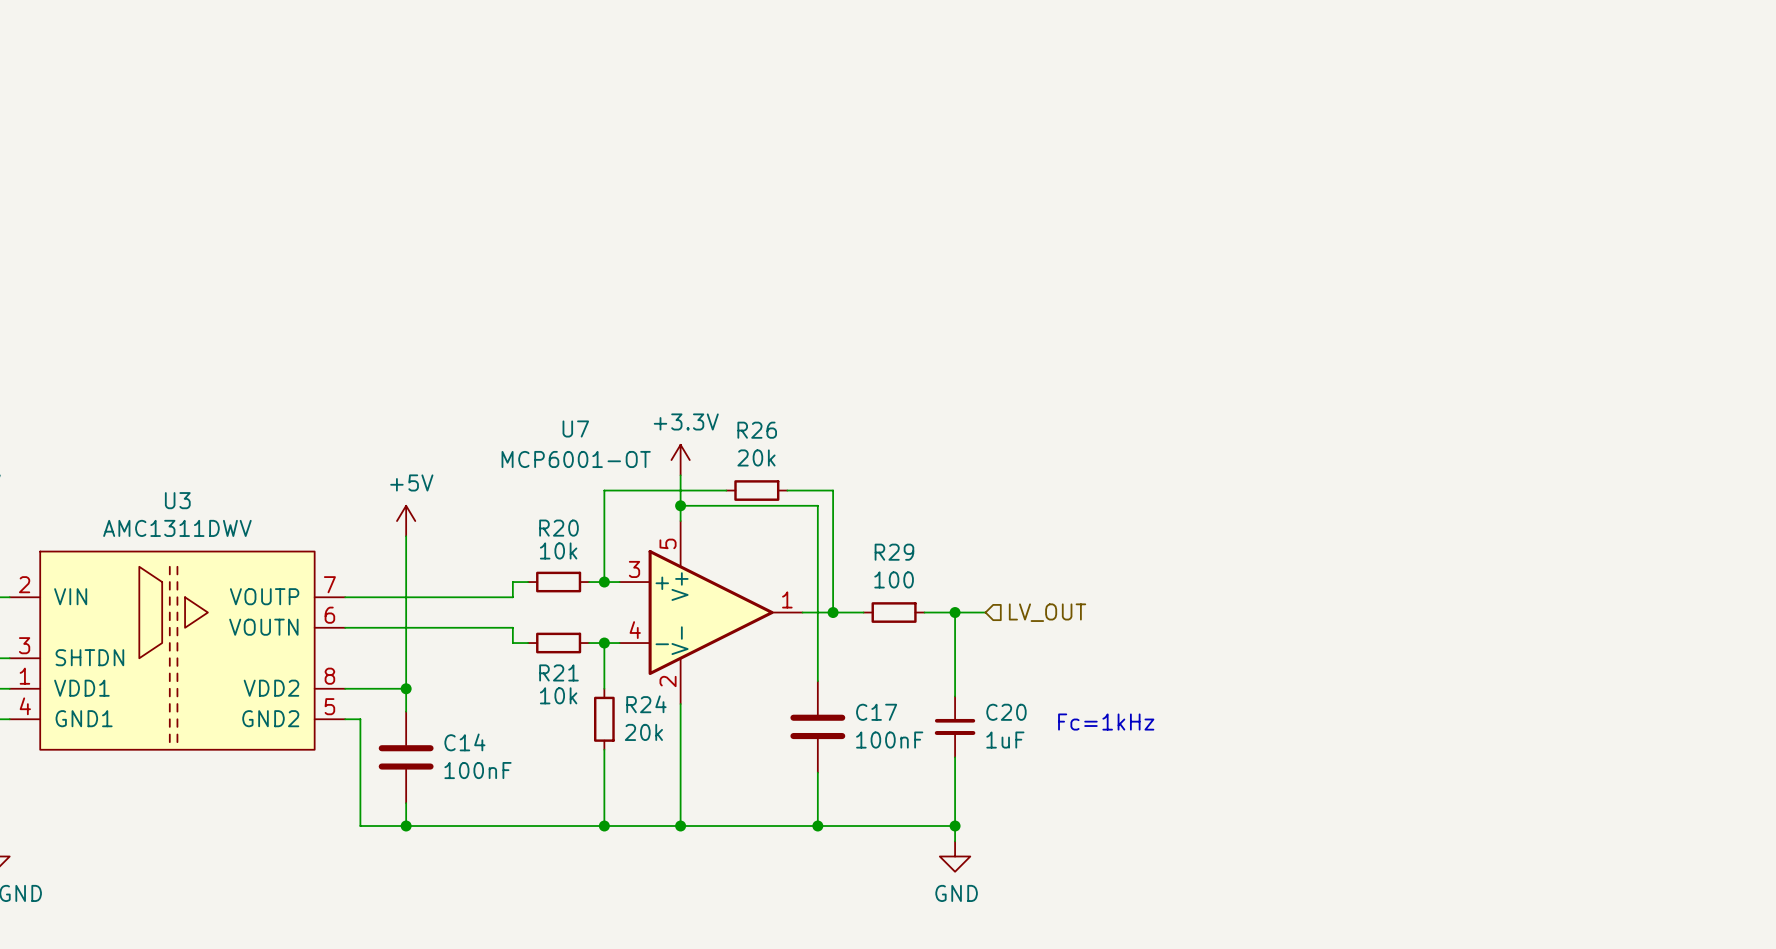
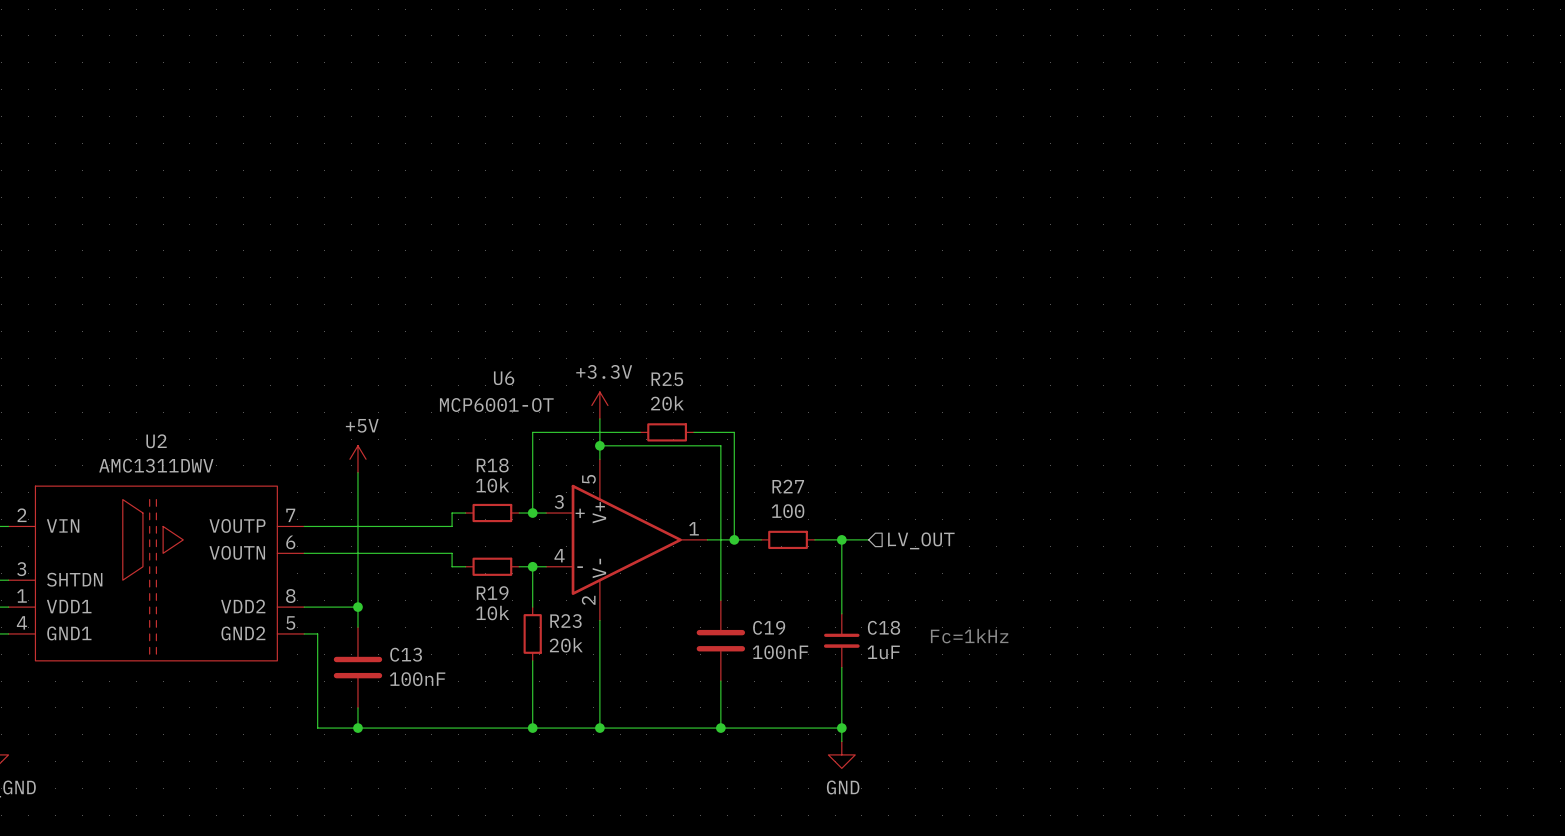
U7 name: U7 (575, 428) -> U6 (504, 378)
R26 name: R26 (757, 430) -> R25 (667, 379)
U3 name: U3 (177, 500) -> U2 (156, 441)
R20 name: R20 (558, 528) -> R18 (492, 465)
R29 name: R29 (894, 552) -> R27 (788, 486)
R21 name: R21 (558, 672) -> R19 (492, 593)
R24 name: R24 (646, 704) -> R23 (565, 621)
C17 name: C17 (876, 712) -> C19 (769, 627)
C20 name: C20 (1006, 712) -> C18 (884, 627)
C14 name: C14 (464, 742) -> C13 (406, 654)

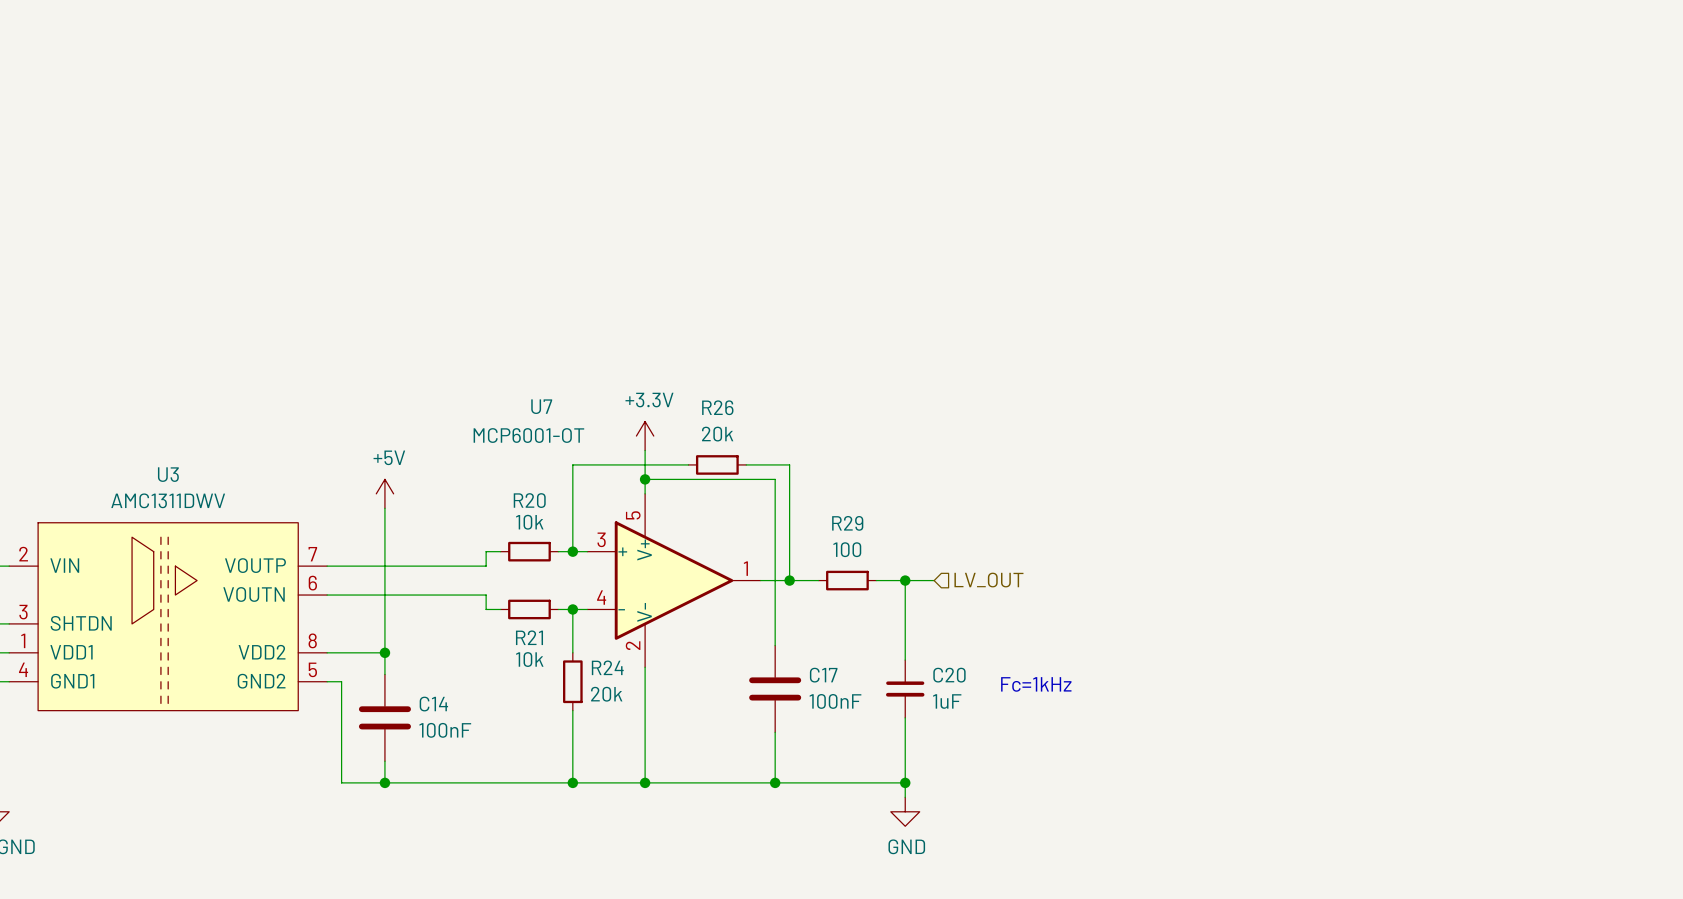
U6 name: U6 (504, 378) -> U7 (541, 406)
R25 name: R25 (667, 379) -> R26 (717, 407)
U2 name: U2 (156, 441) -> U3 (168, 474)
R18 name: R18 (492, 465) -> R20 (529, 500)
R27 name: R27 (788, 486) -> R29 (847, 523)
R19 name: R19 (492, 593) -> R21 (529, 637)
R23 name: R23 (565, 621) -> R24 (607, 667)
C19 name: C19 (769, 627) -> C17 (823, 675)
C18 name: C18 (884, 627) -> C20 (949, 675)
C13 name: C13 (406, 654) -> C14 (433, 704)

